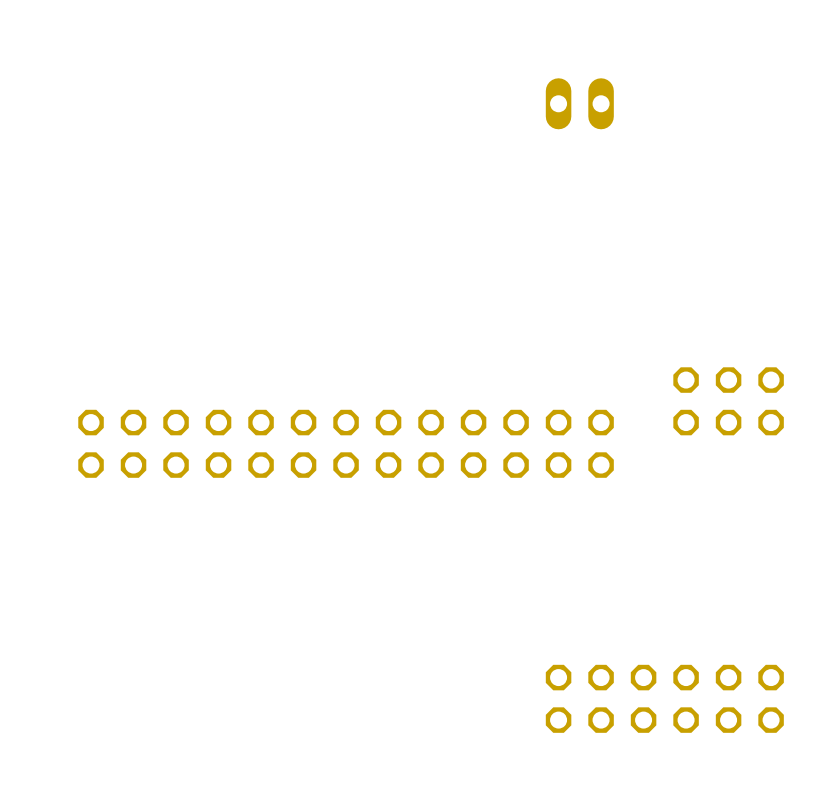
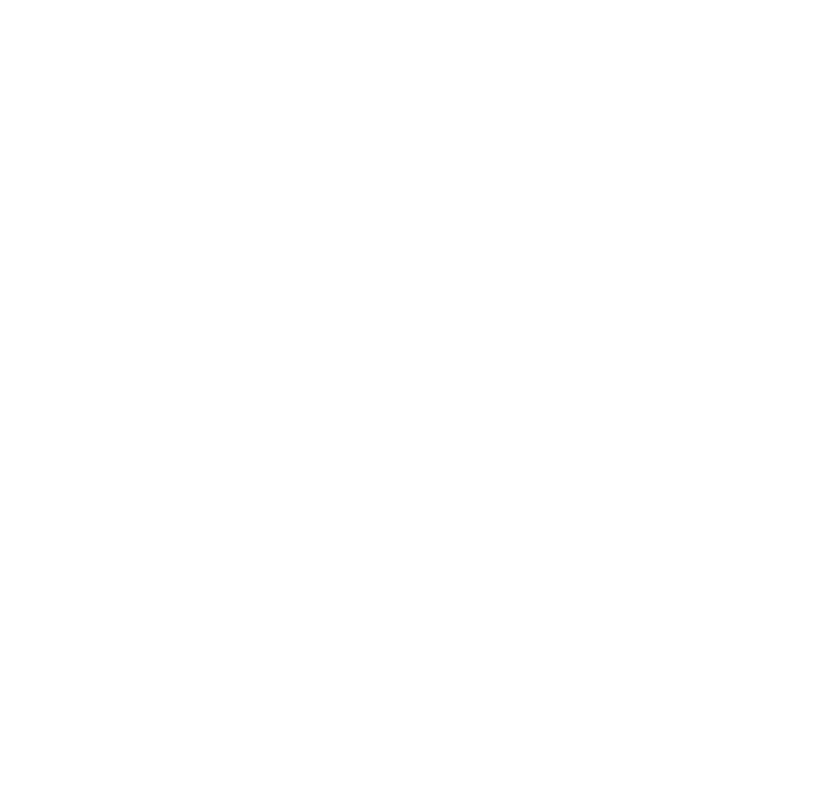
part: (579, 103) -> none
part: (728, 401) -> none
part: (346, 443) -> none
part: (664, 698) -> none

